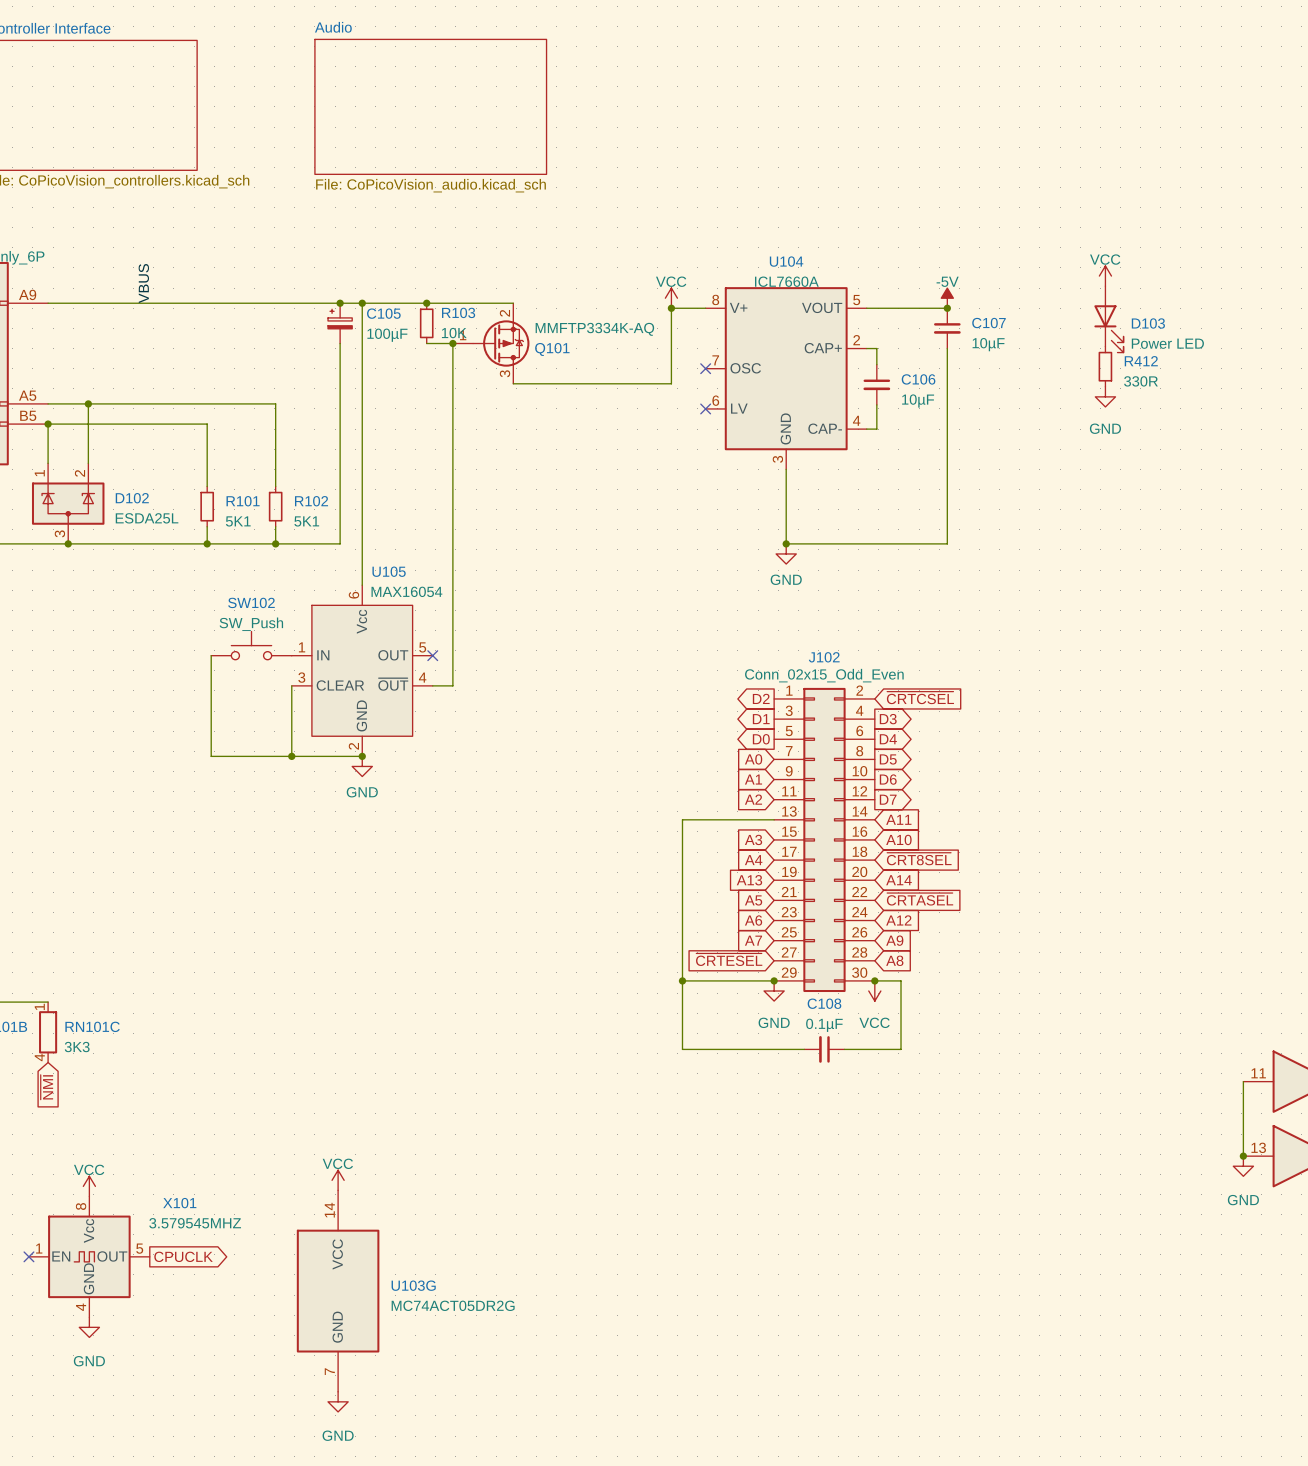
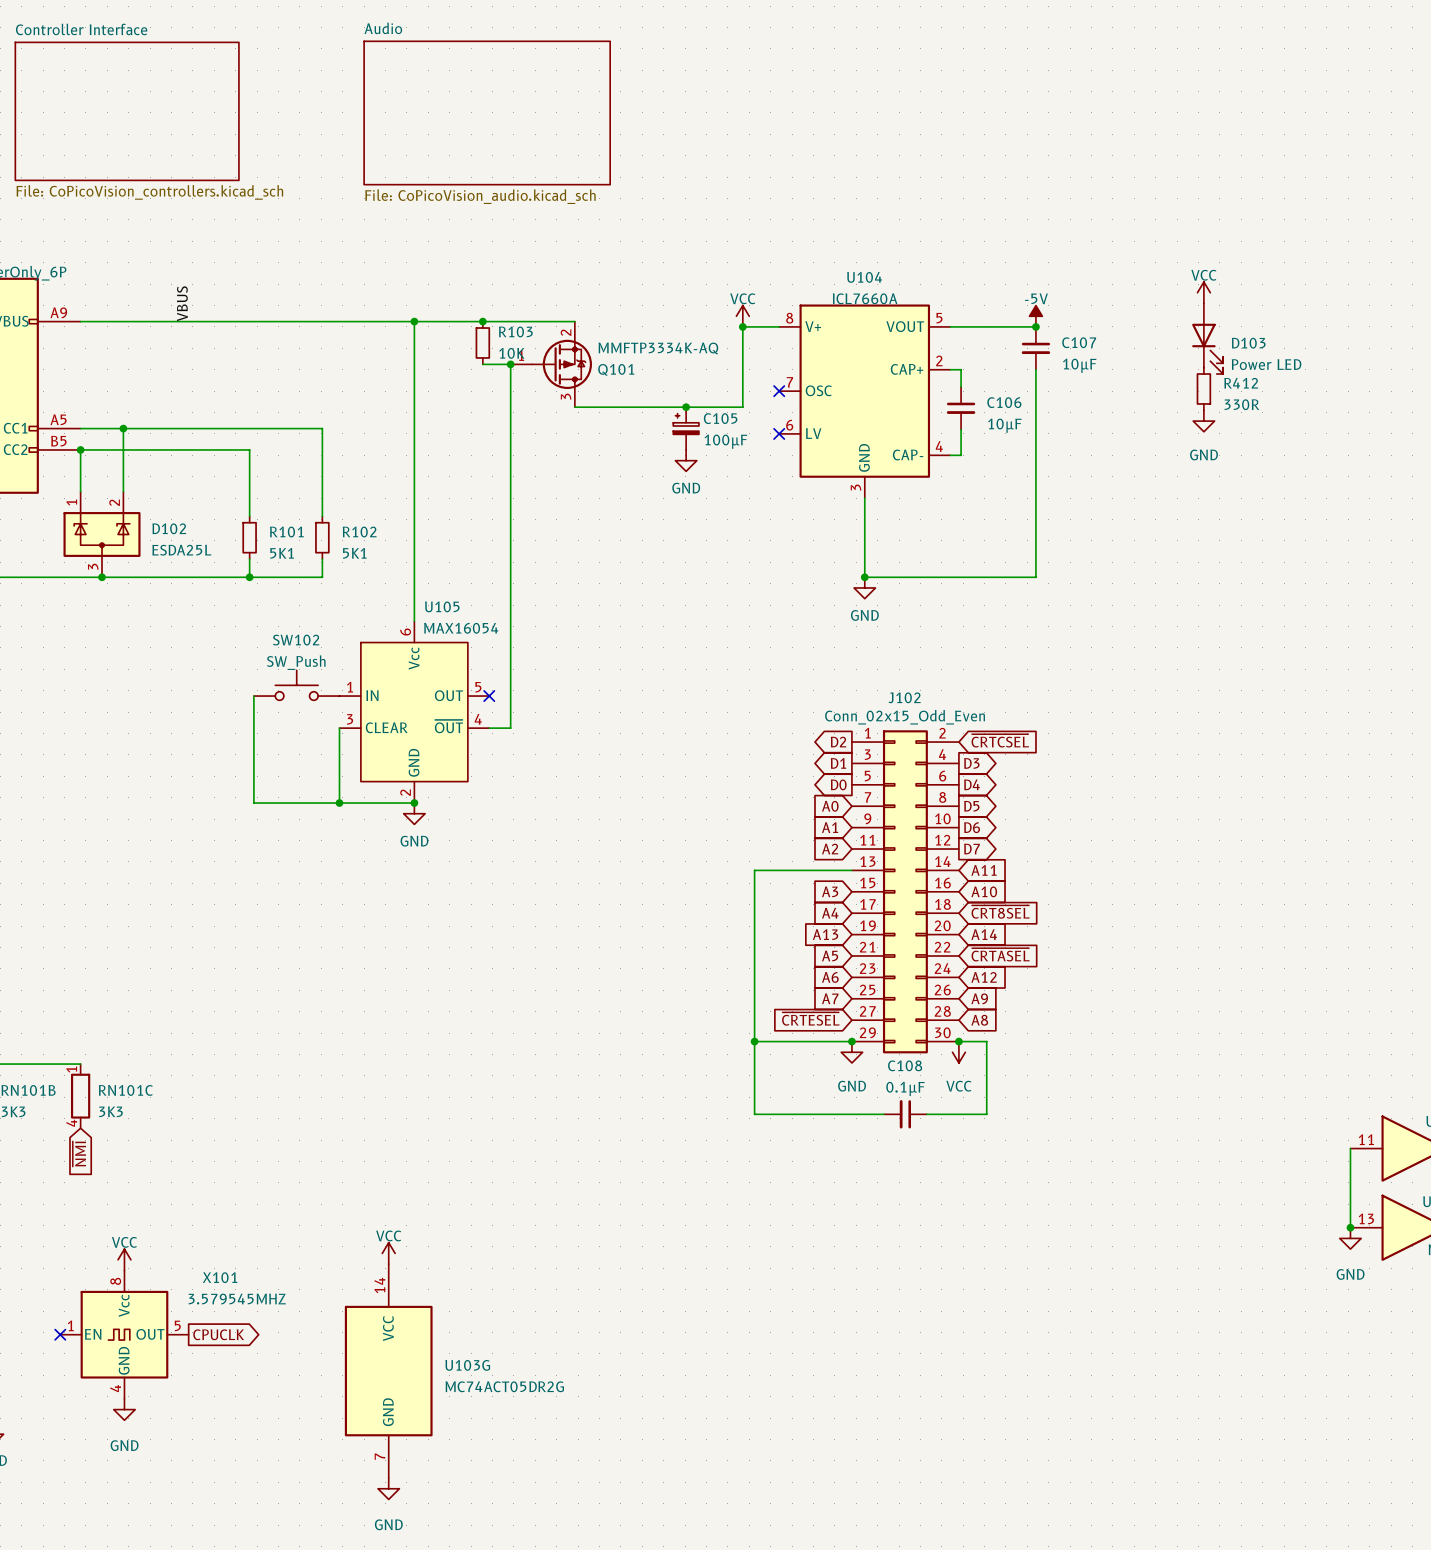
junction: (340, 303) -> none
C105 name position: C105 (383, 313) -> C105 (720, 418)
C105 position: (340, 323) -> (686, 428)
C105 value position: 100µF (387, 335) -> 100µF (725, 441)
wire: (340, 343) (340, 543) (275, 543) -> none
junction: none -> (686, 407)
power symbol: none -> GND (686, 460)
junction: (275, 543) -> none

